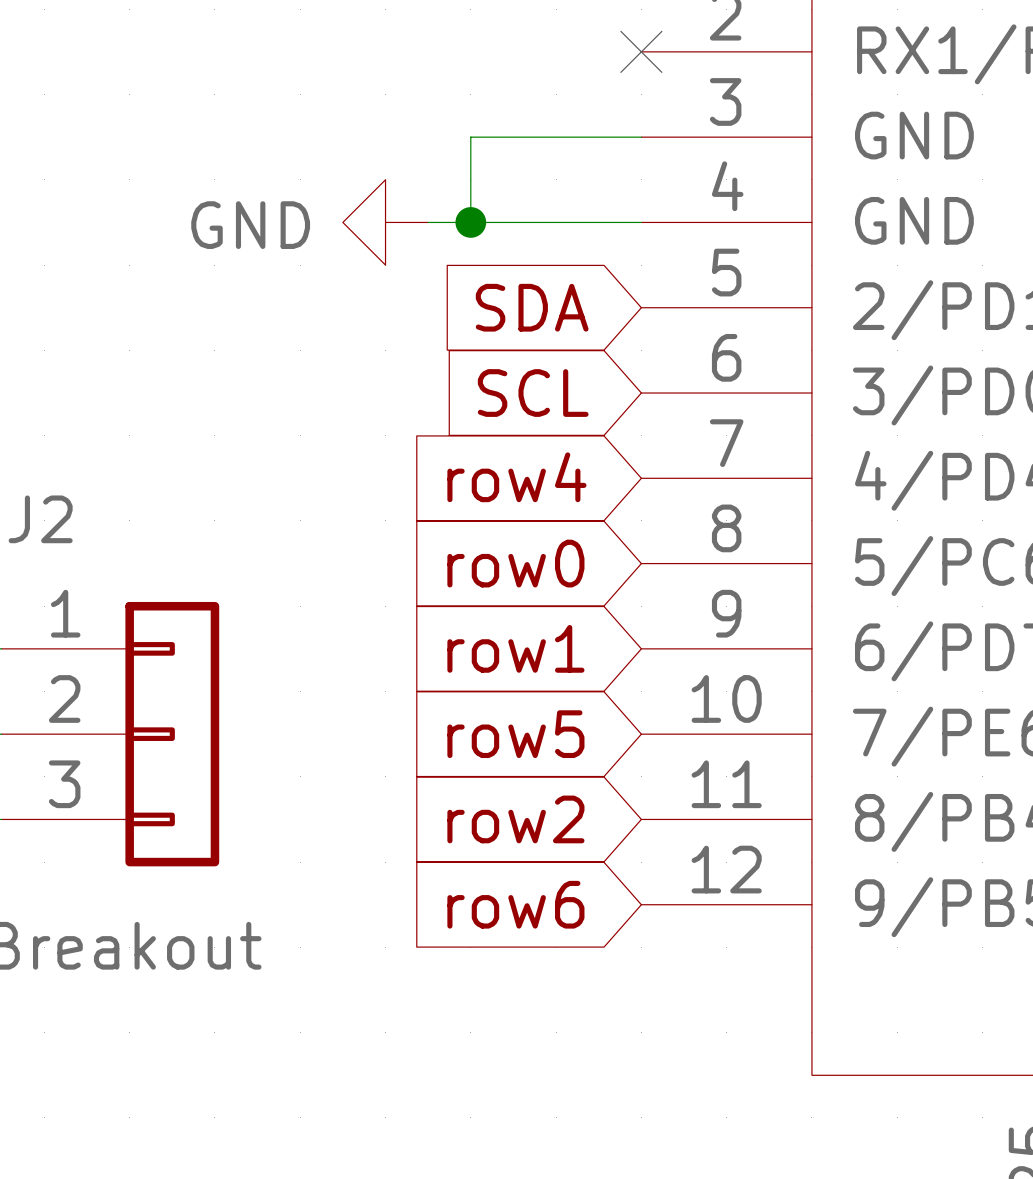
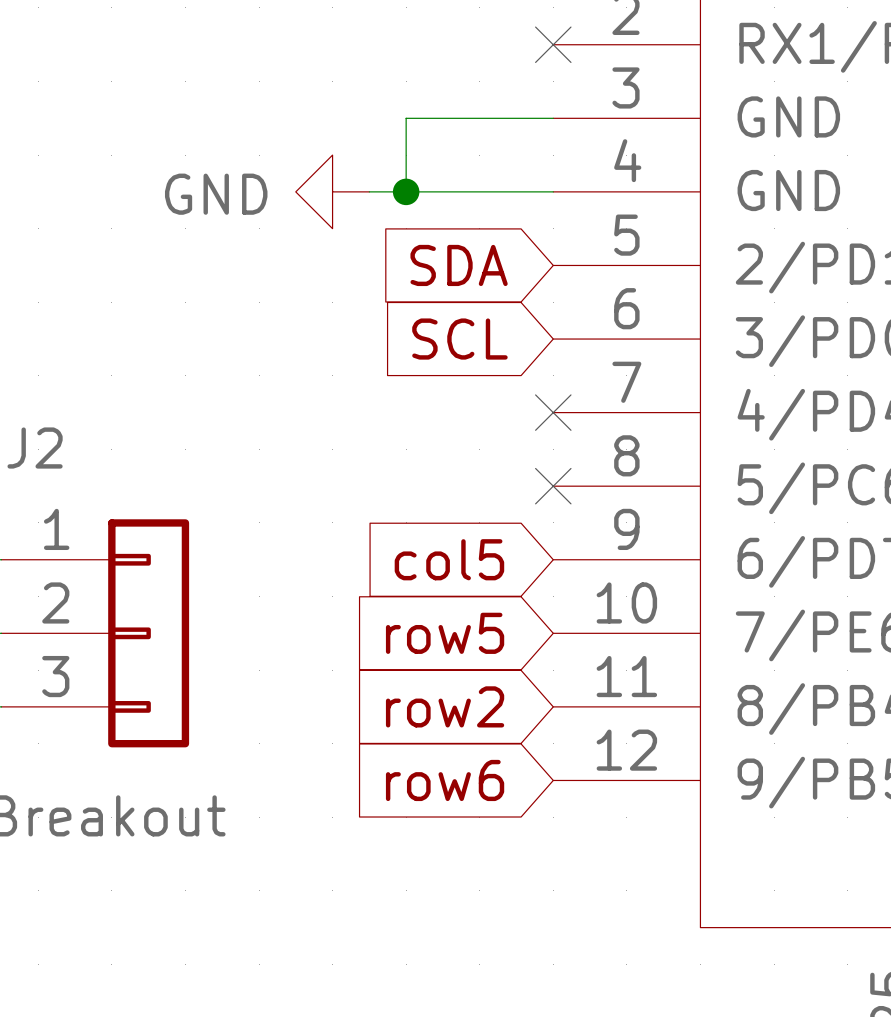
global label: row4 (516, 477) -> none
no-connect mark: none -> (553, 412)
global label: row0 (515, 563) -> none
no-connect mark: none -> (553, 486)
global label: row1 (515, 648) -> col5 (449, 559)

